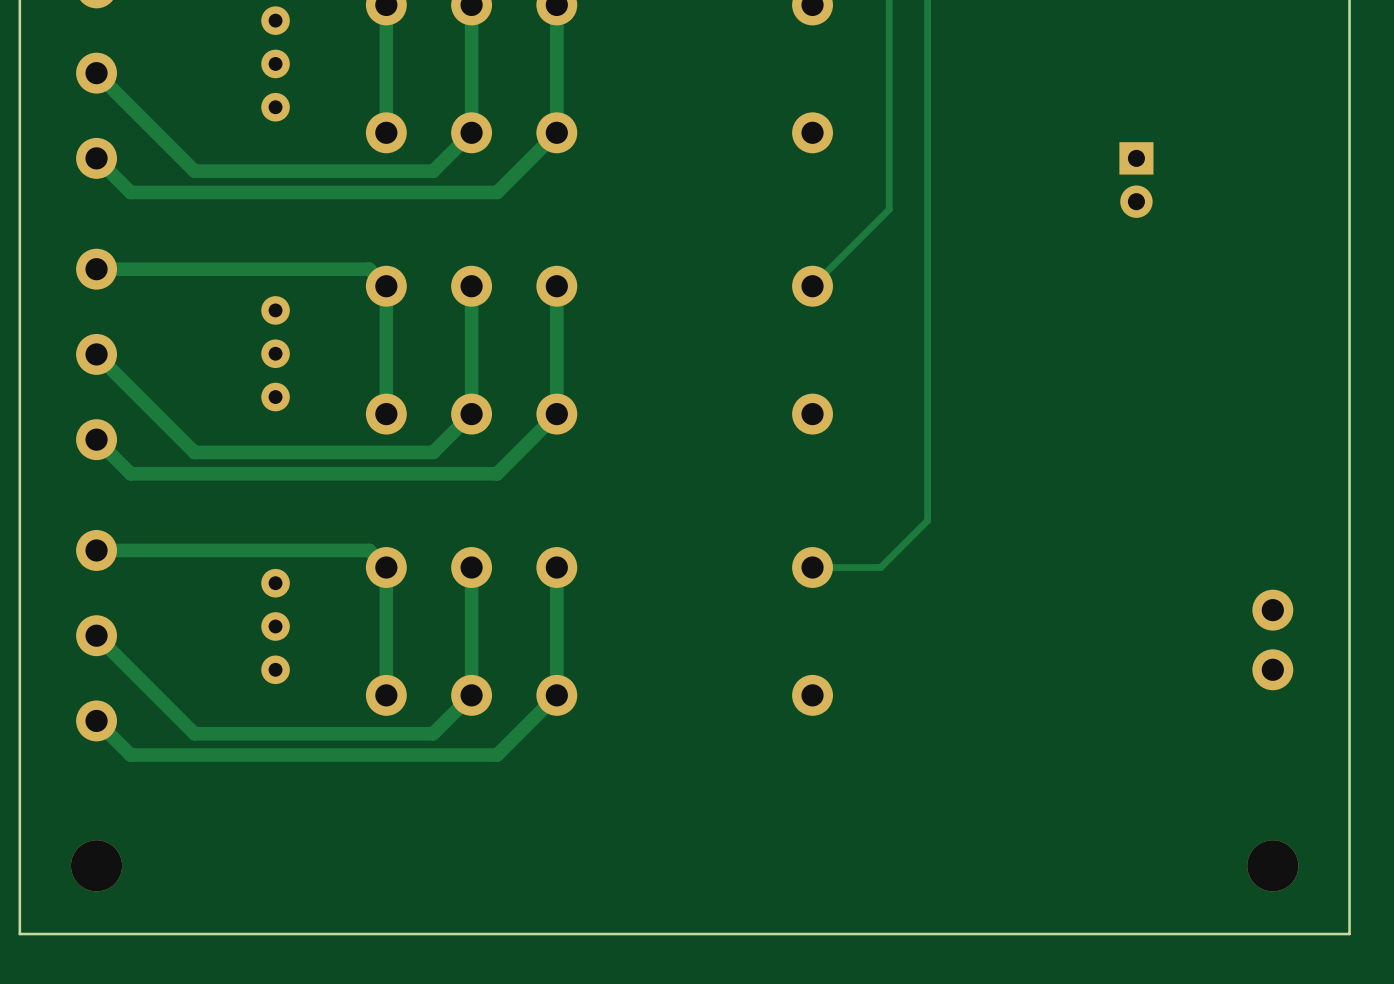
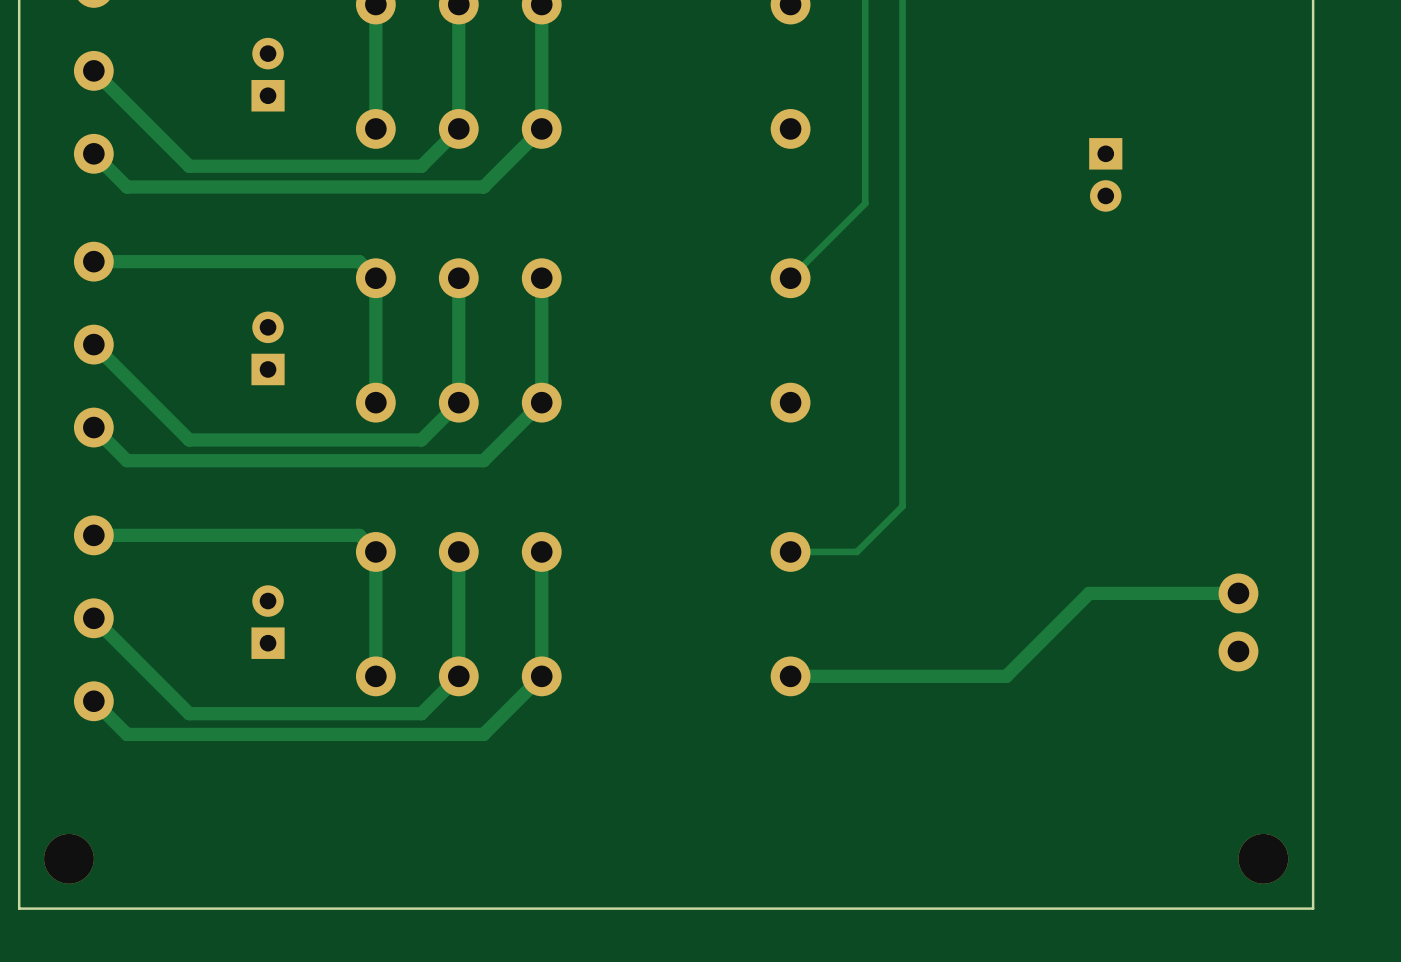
part footprint: [261, 6, 290, 122] -> [251, 37, 285, 112]
part footprint: [261, 296, 290, 412] -> [251, 311, 285, 386]
part footprint: [261, 568, 290, 685] -> [251, 585, 285, 659]
track: none -> (1238, 593) (1089, 593) (1006, 676) (790, 676)
part position: (96, 865) -> (68, 858)
part position: (1272, 865) -> (1263, 858)

